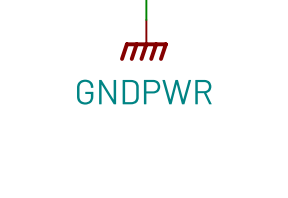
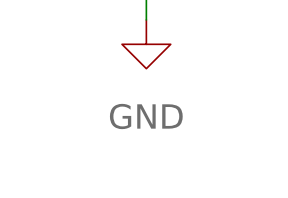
power symbol: GNDPWR (143, 40) -> GND (146, 44)

